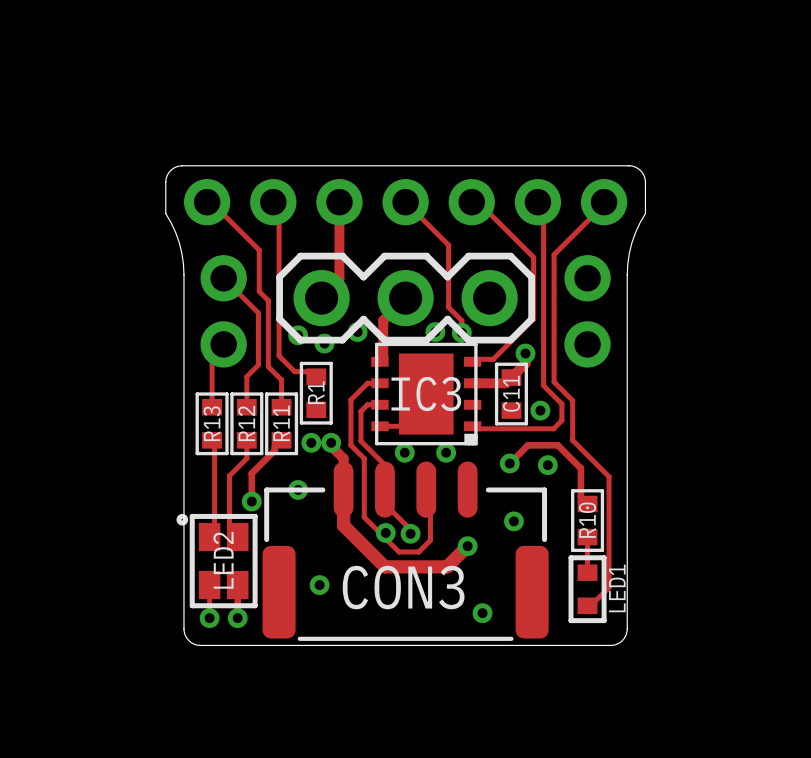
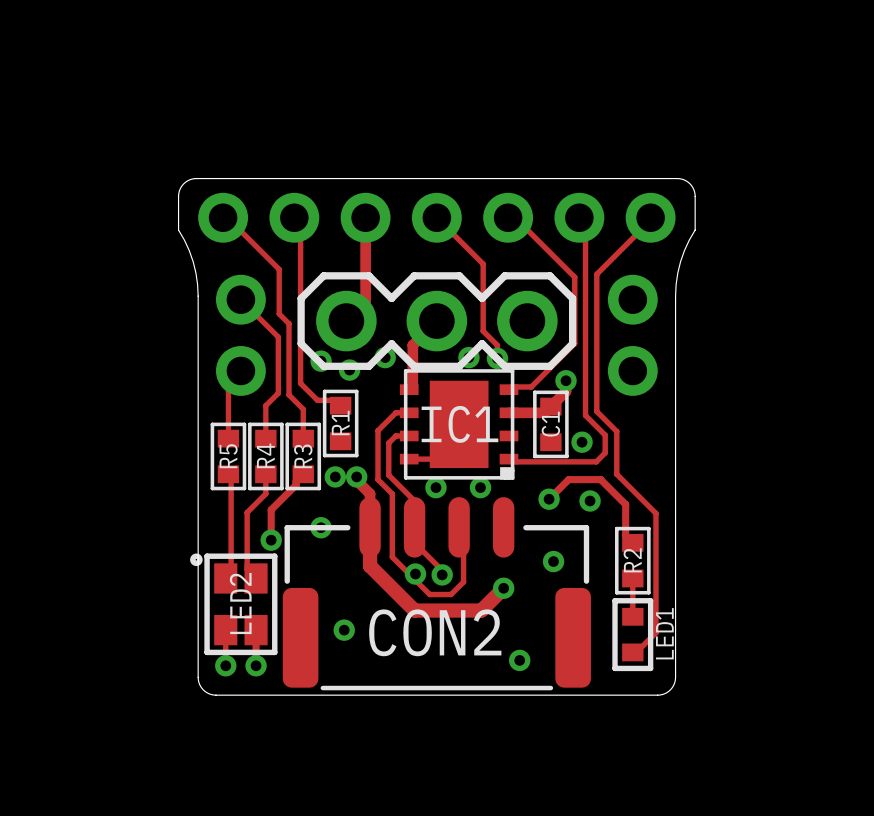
C11 name: C11 (511, 393) -> C1 (550, 424)
IC3 name: IC3 (426, 394) -> IC1 (459, 424)
R13 name: R13 (212, 423) -> R5 (228, 456)
R12 name: R12 (246, 423) -> R4 (265, 455)
R11 name: R11 (281, 423) -> R3 (303, 456)
R10 name: R10 (587, 520) -> R2 (632, 560)
CON3 name: CON3 (403, 587) -> CON2 (435, 632)

